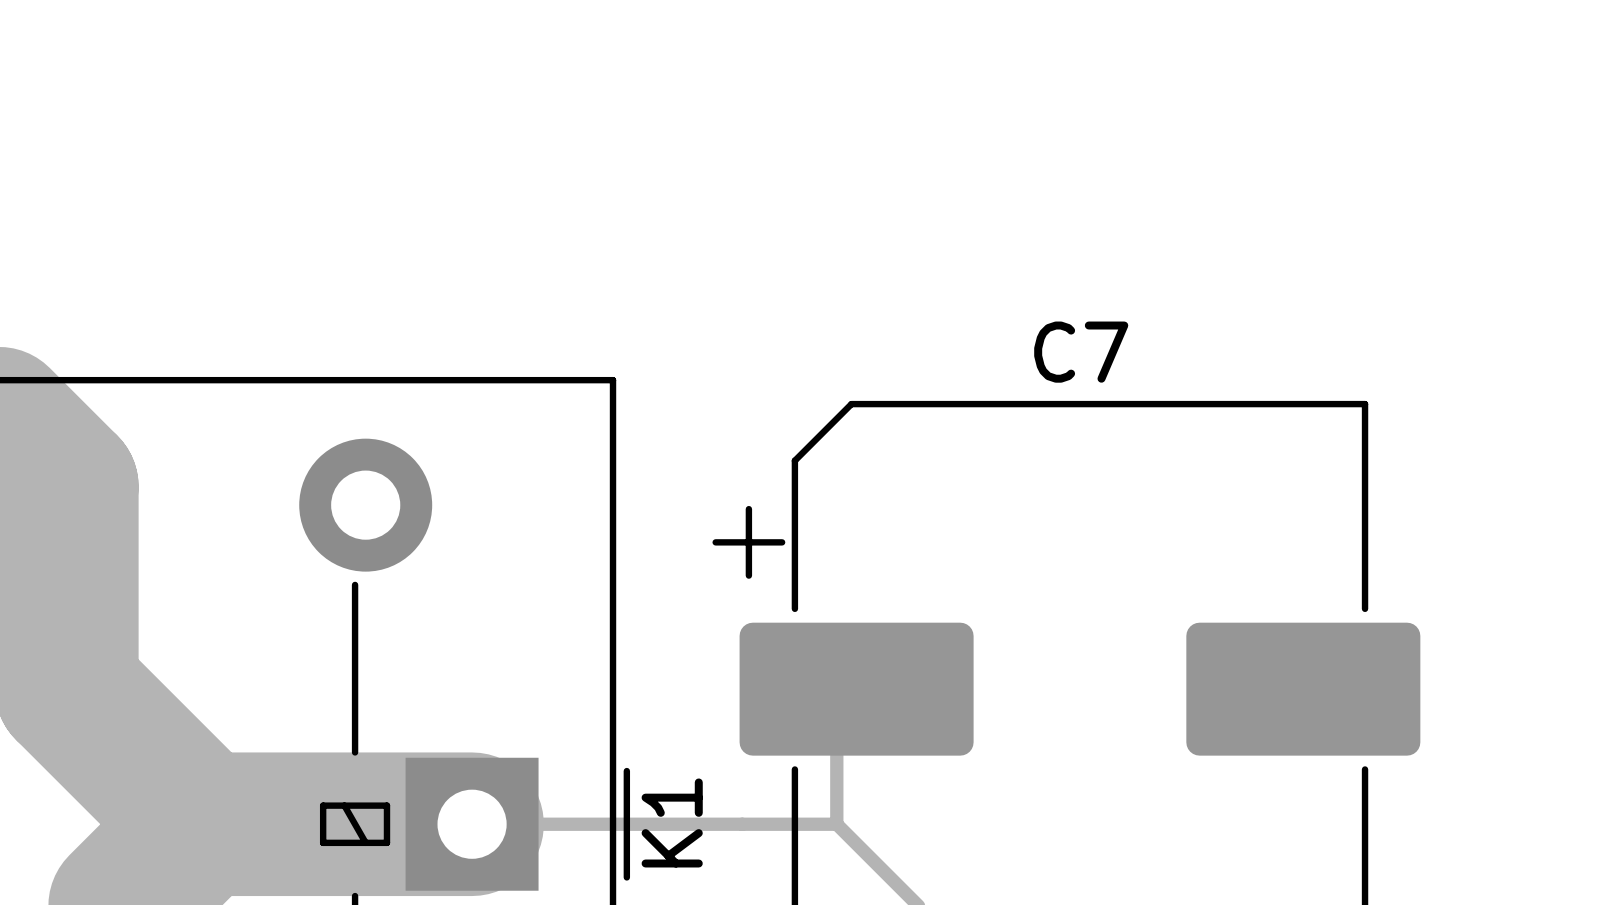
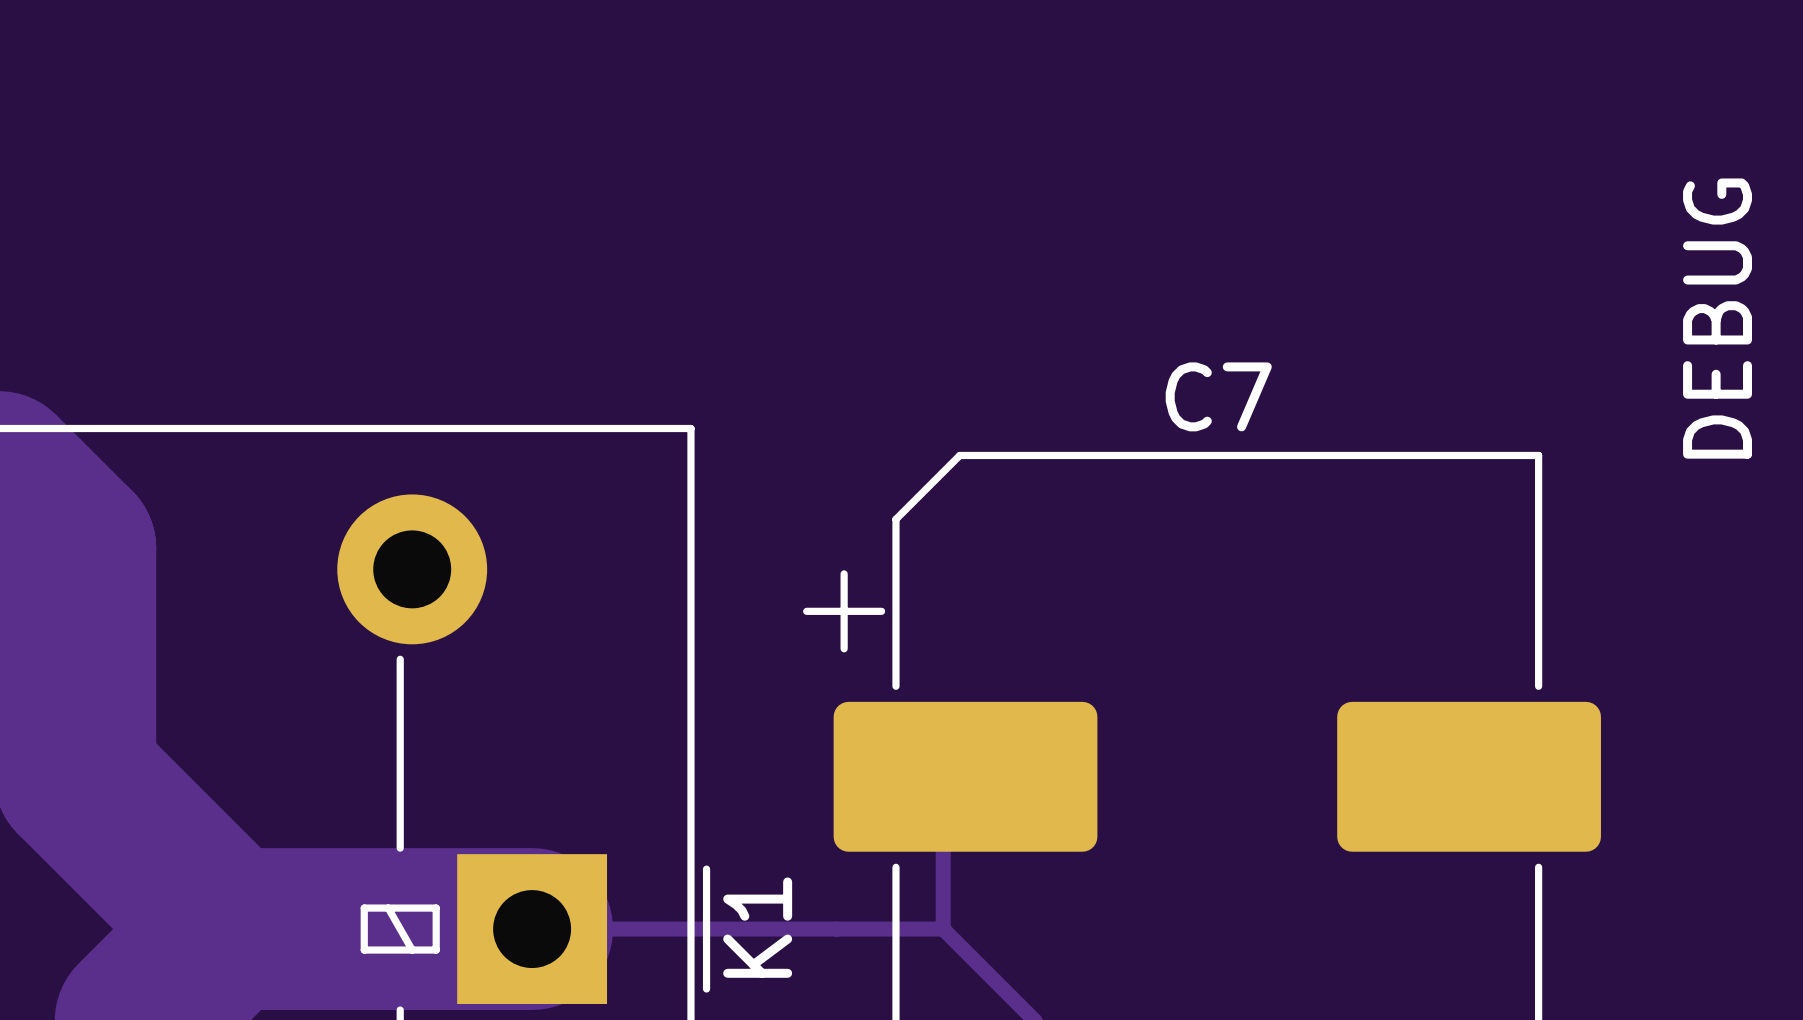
text: none -> DEBUG (1717, 318)

